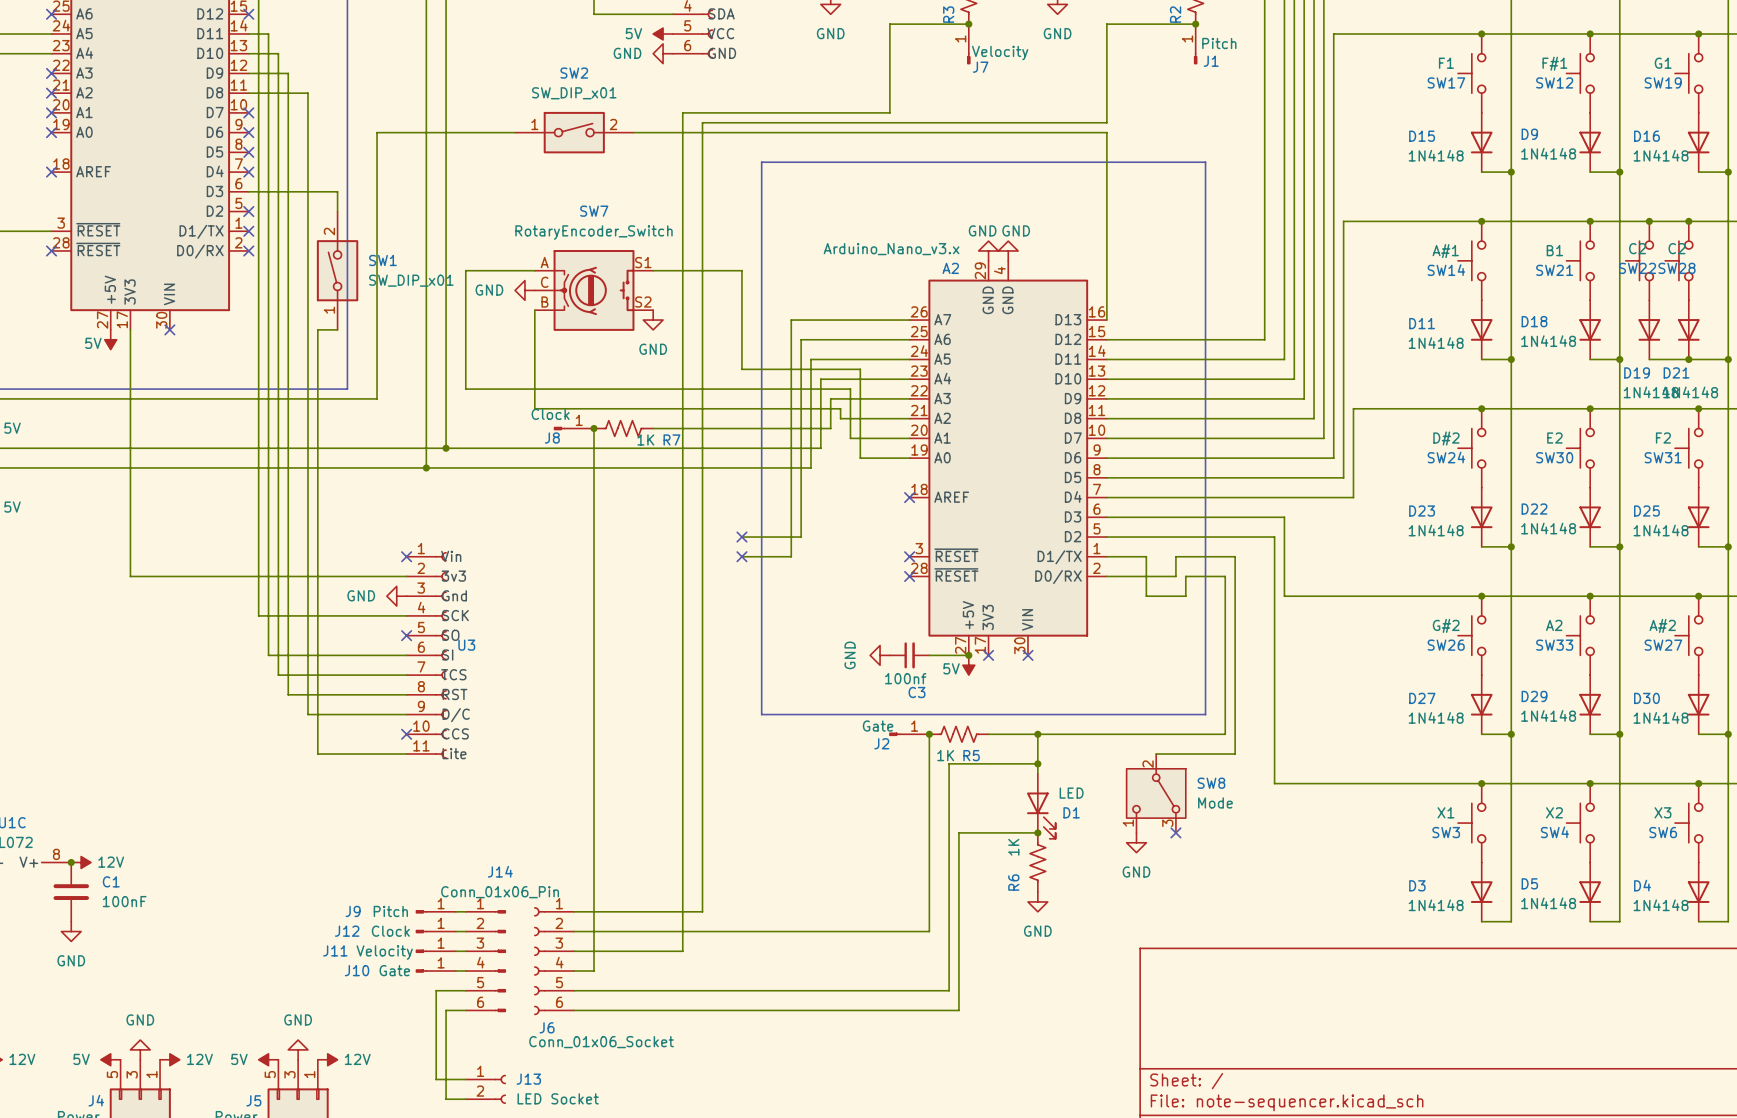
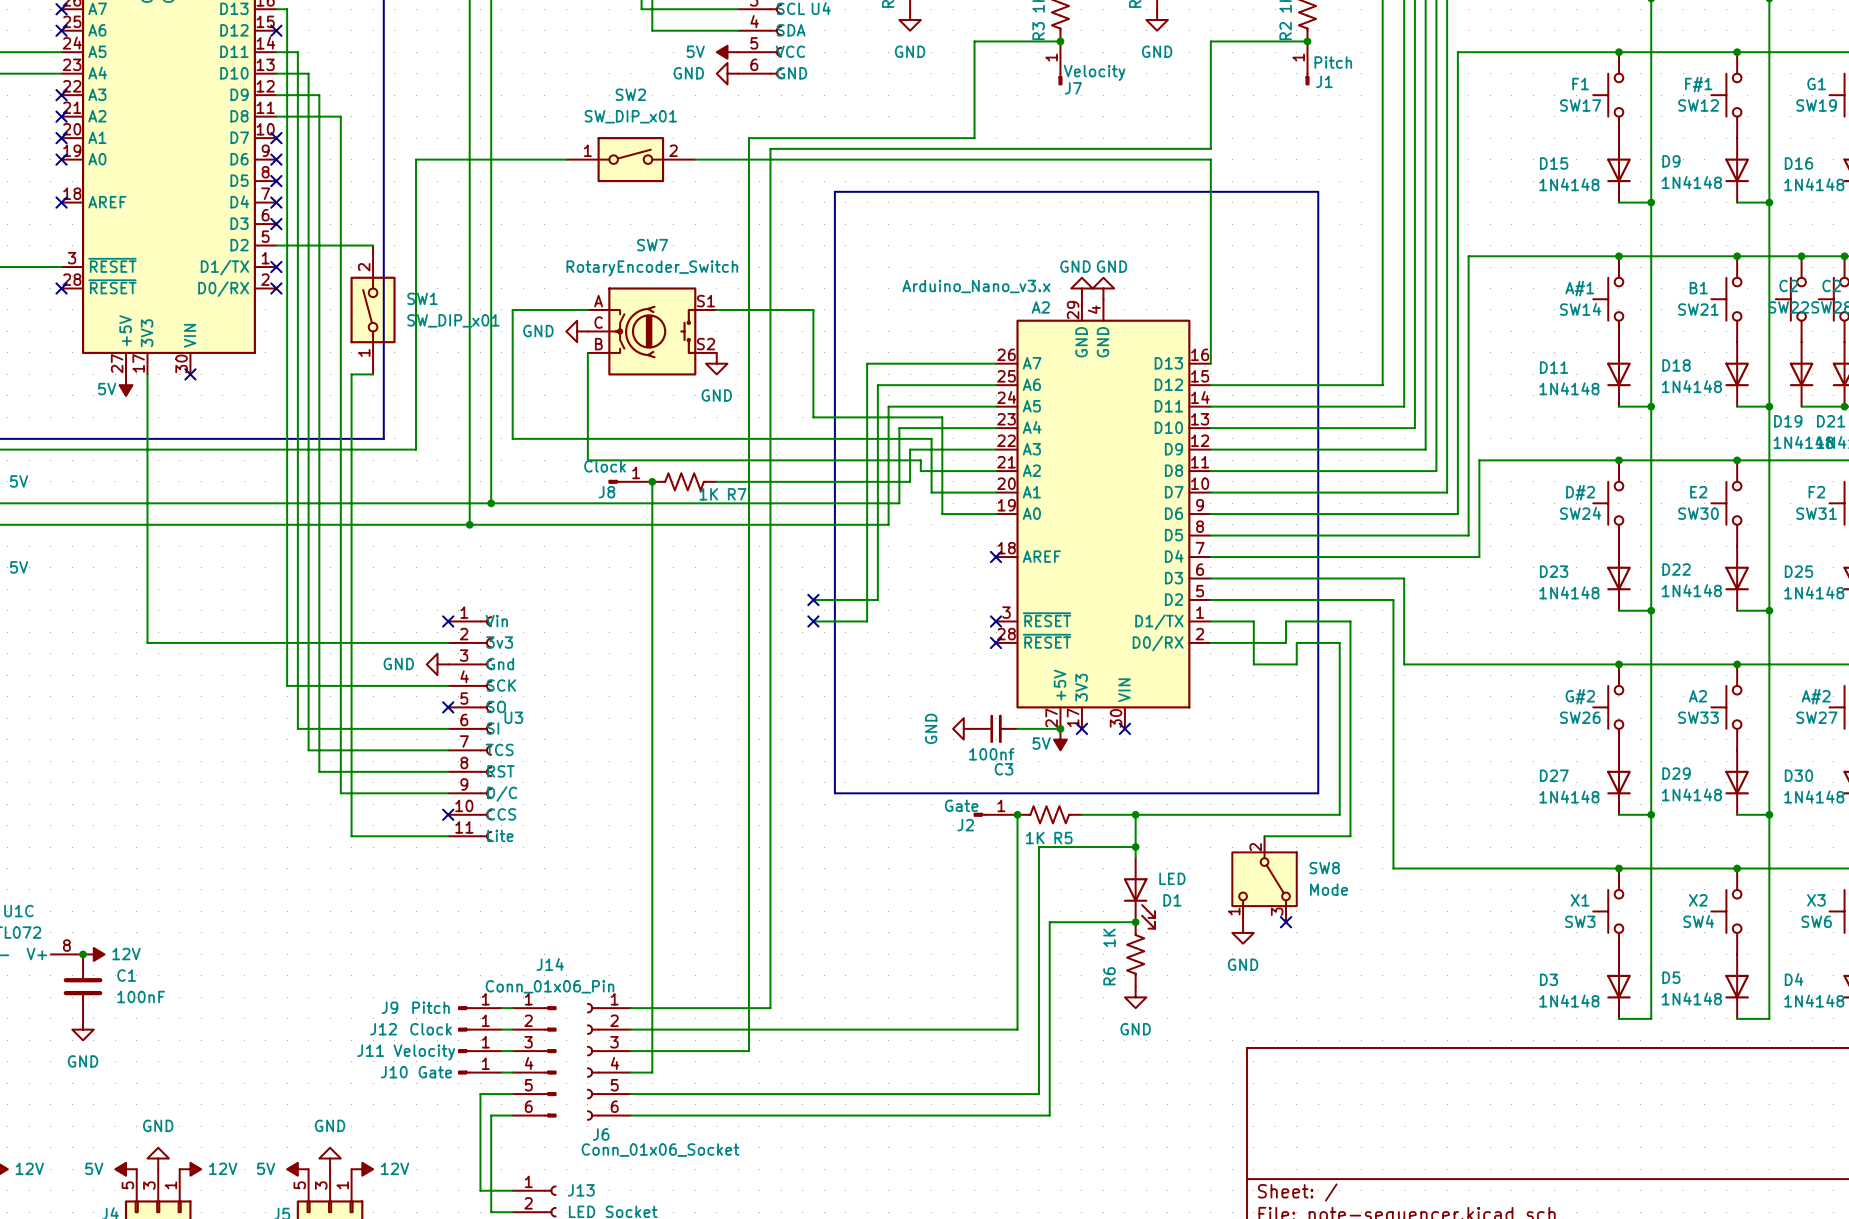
wire: (248, 191) (337, 191) (337, 211) -> (276, 245) (373, 245)
no-connect mark position: (248, 211) -> (276, 224)

